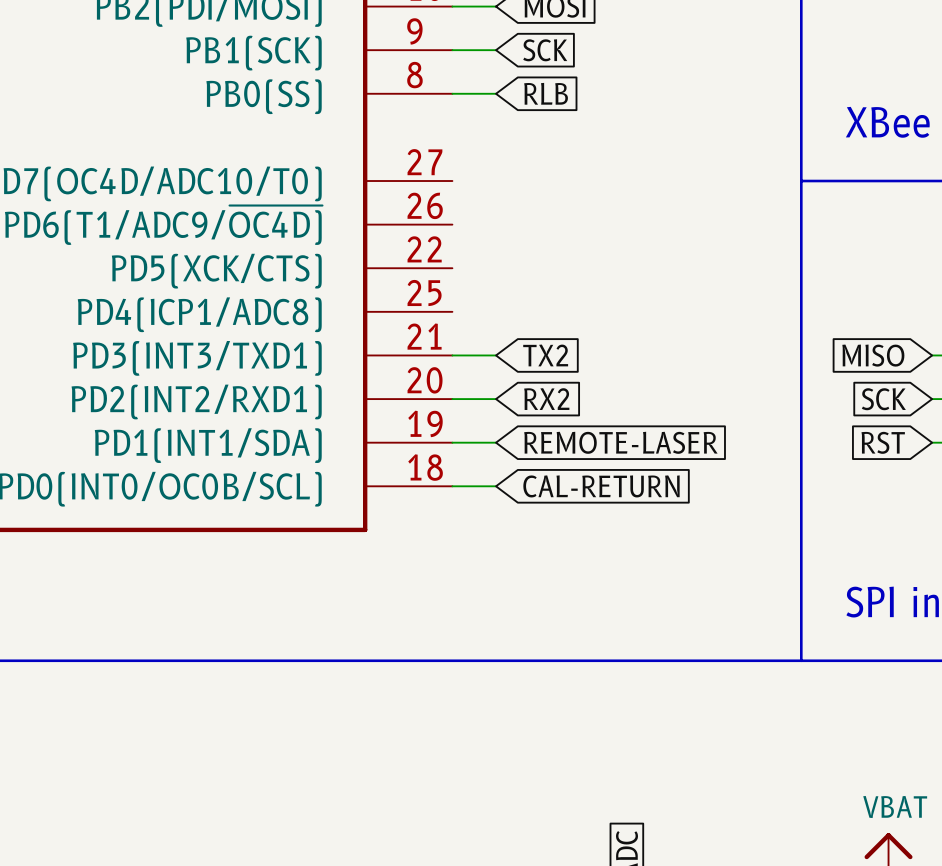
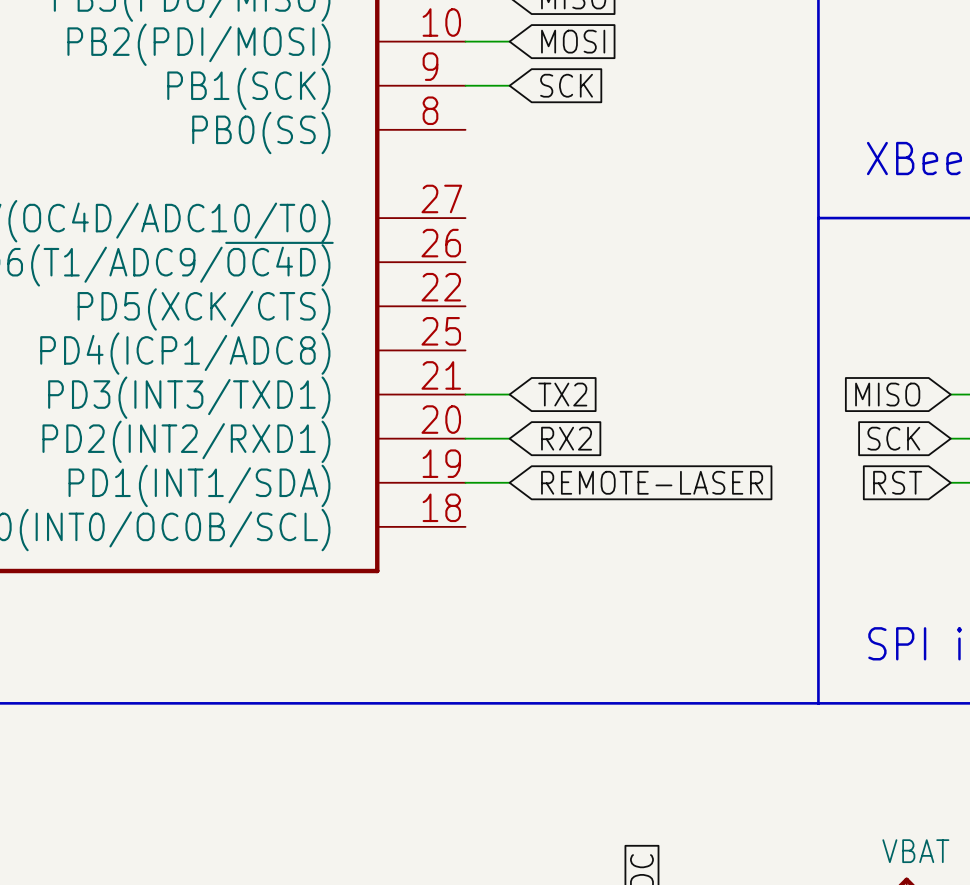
wire: (452, 93) (496, 93) -> none
global label: RLB (546, 93) -> none
wire: (452, 486) (496, 486) -> none
global label: CAL-RETURN (601, 486) -> none

